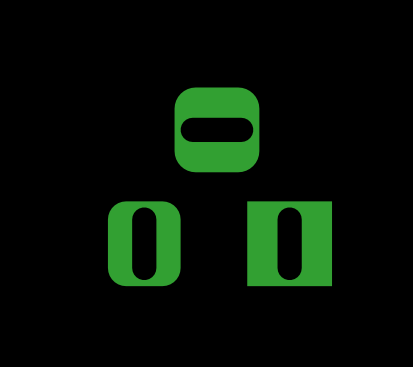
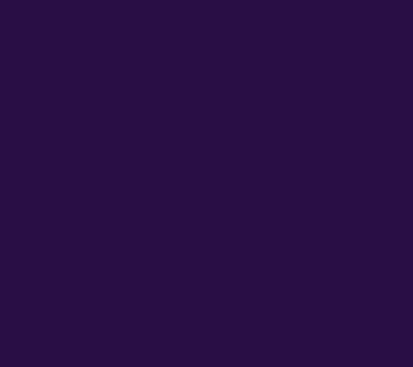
part: (219, 186) -> none

